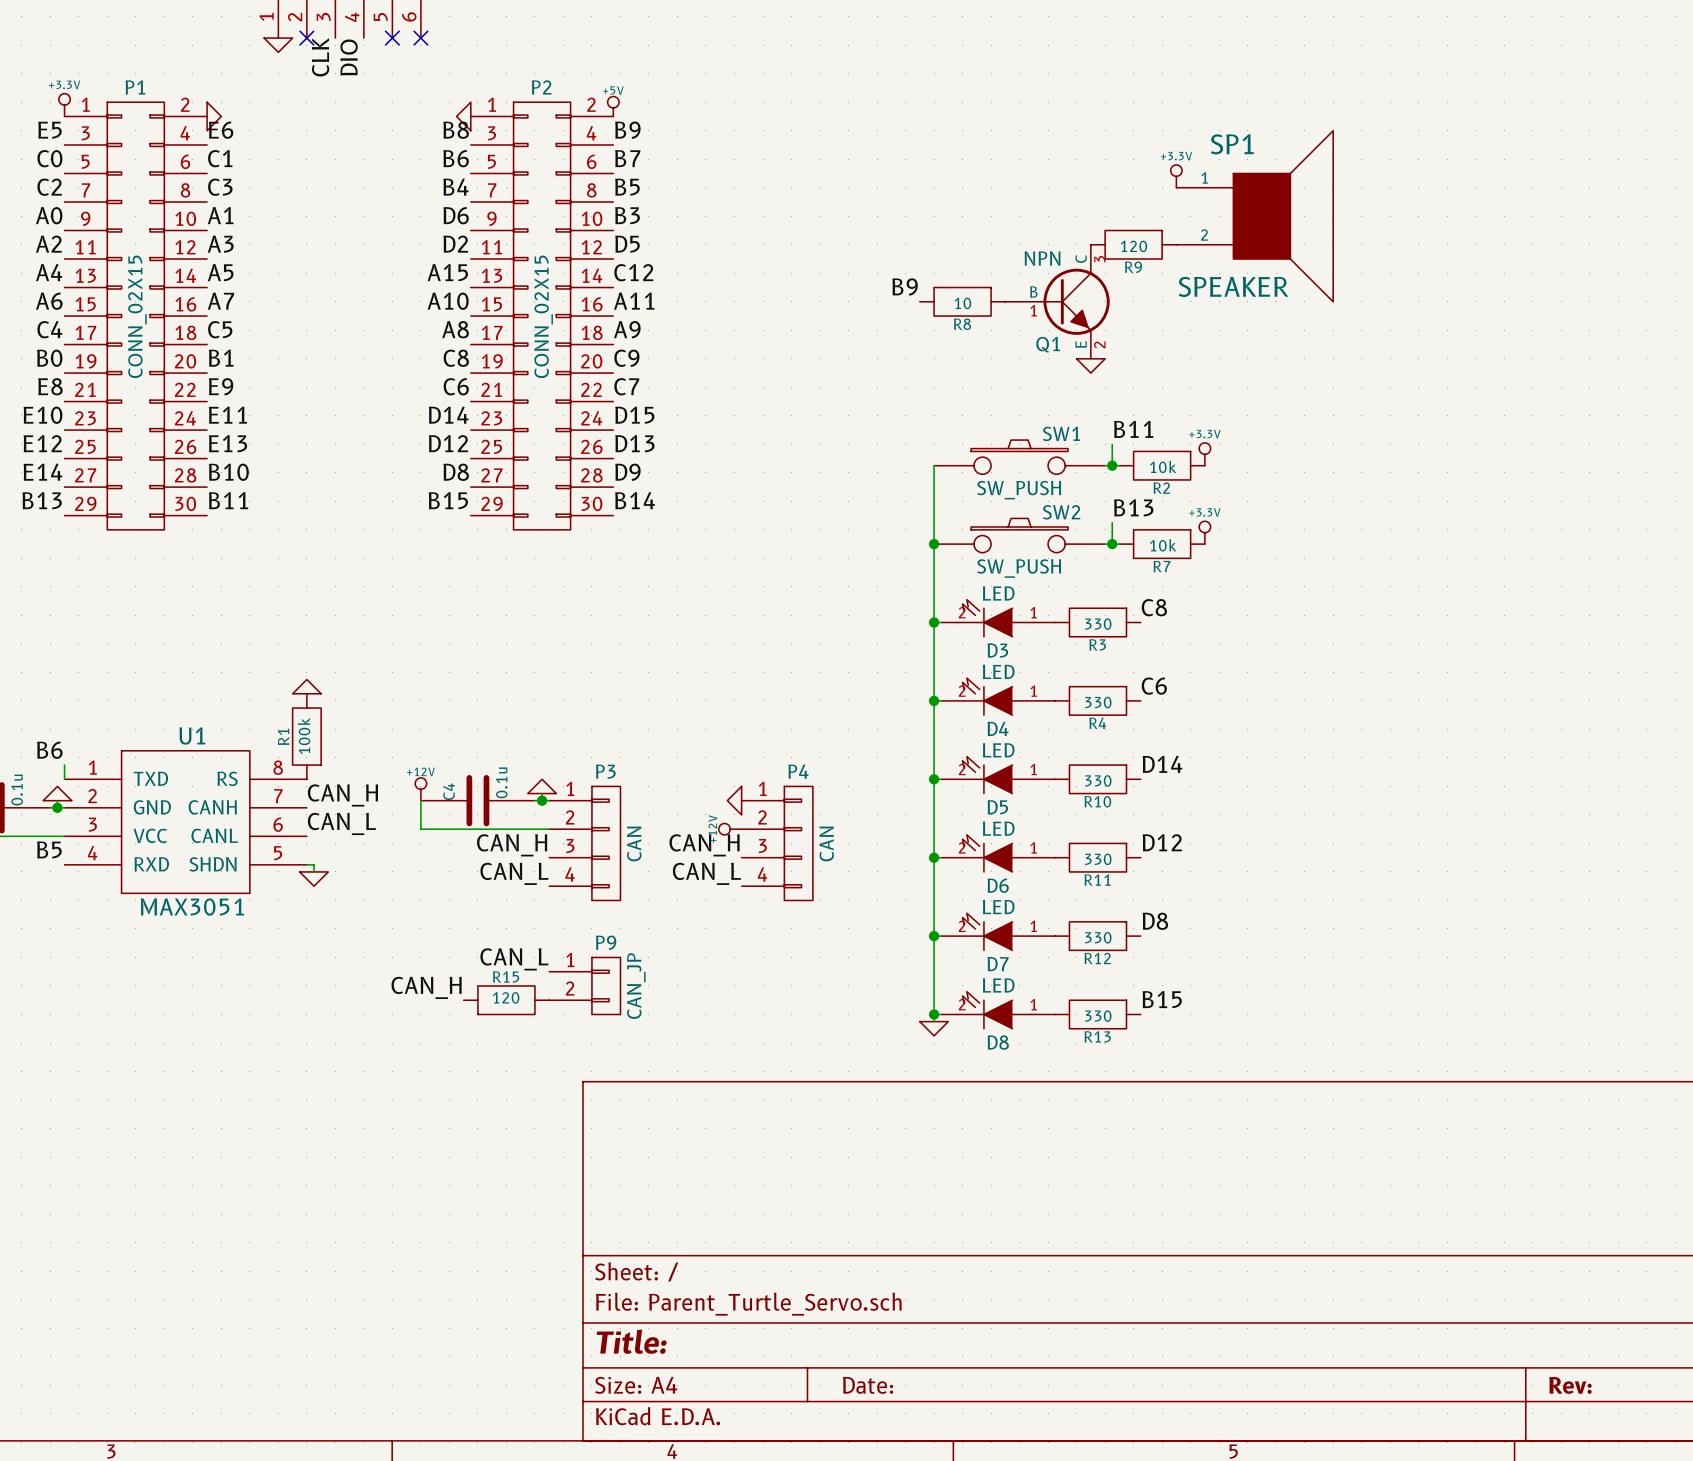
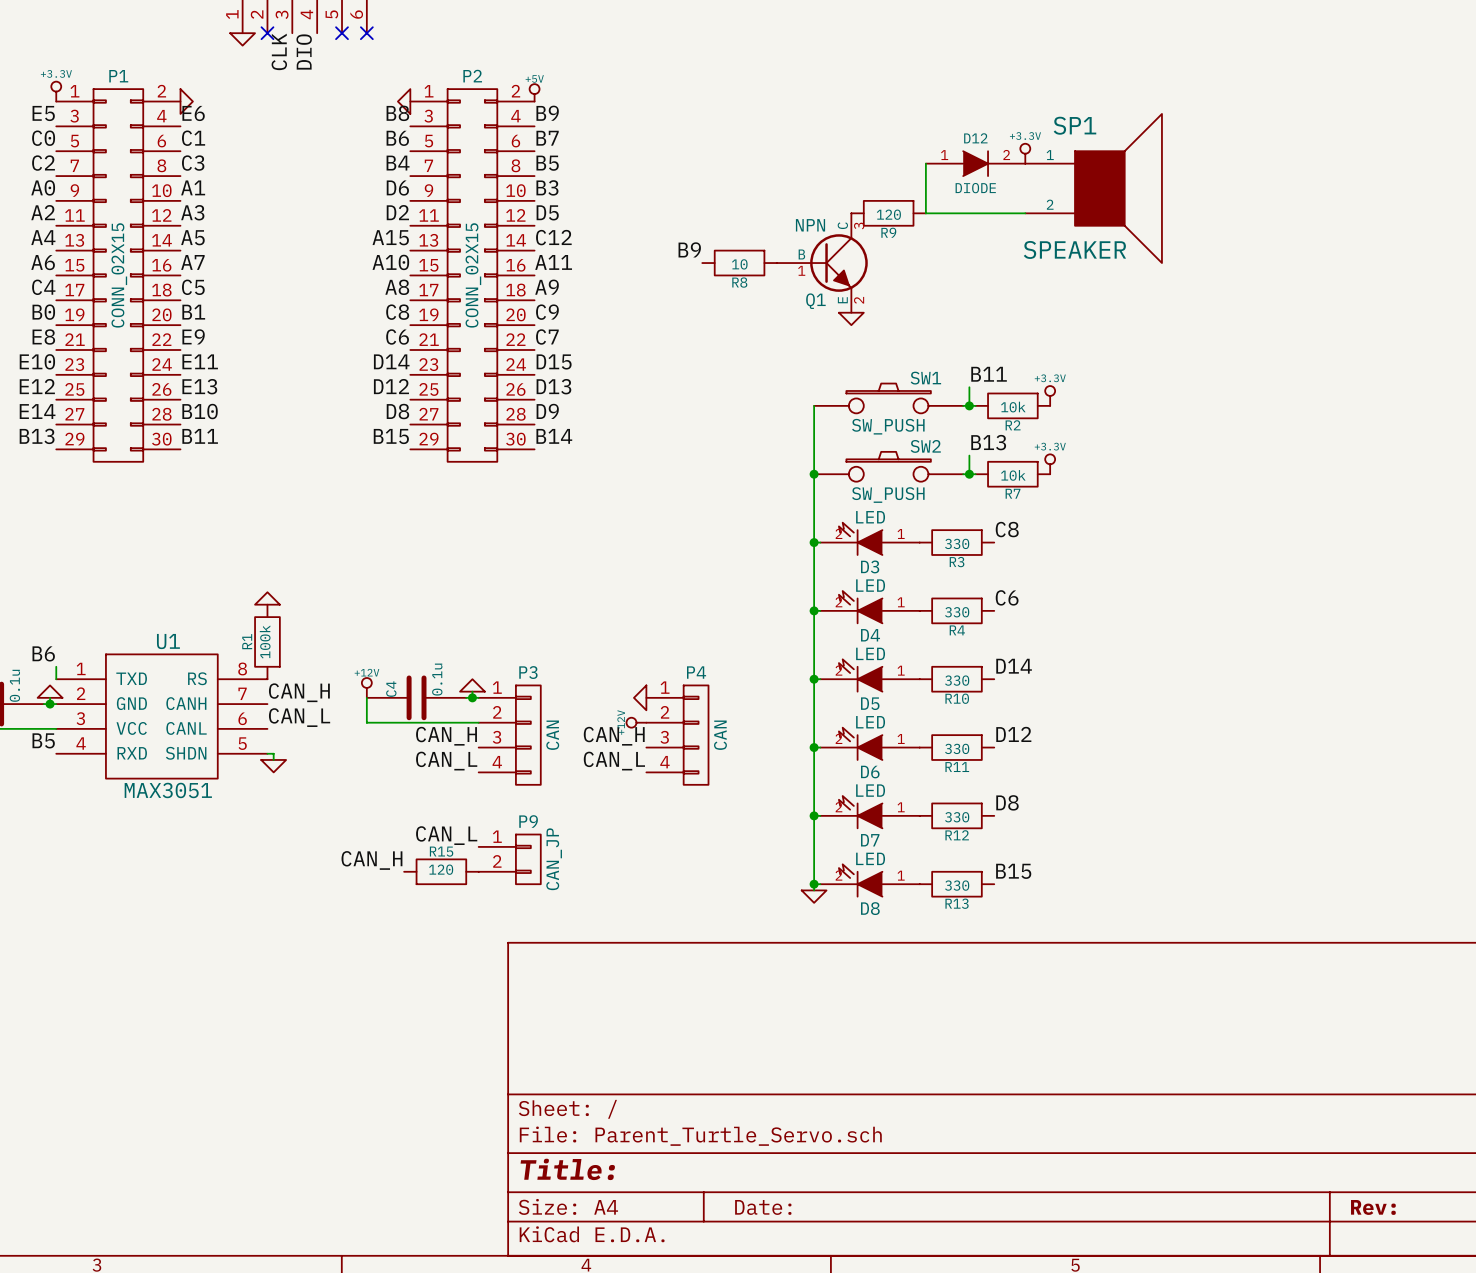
wire: none -> (925, 163) (925, 213) (1025, 213)
D12: none -> DIODE (975, 163)
R9 position: (1133, 244) -> (888, 213)
label position: B9 (905, 286) -> B9 (689, 249)
R8 position: (962, 301) -> (739, 263)
Q1 position: (1057, 301) -> (822, 263)
power symbol position: (1090, 365) -> (851, 318)

